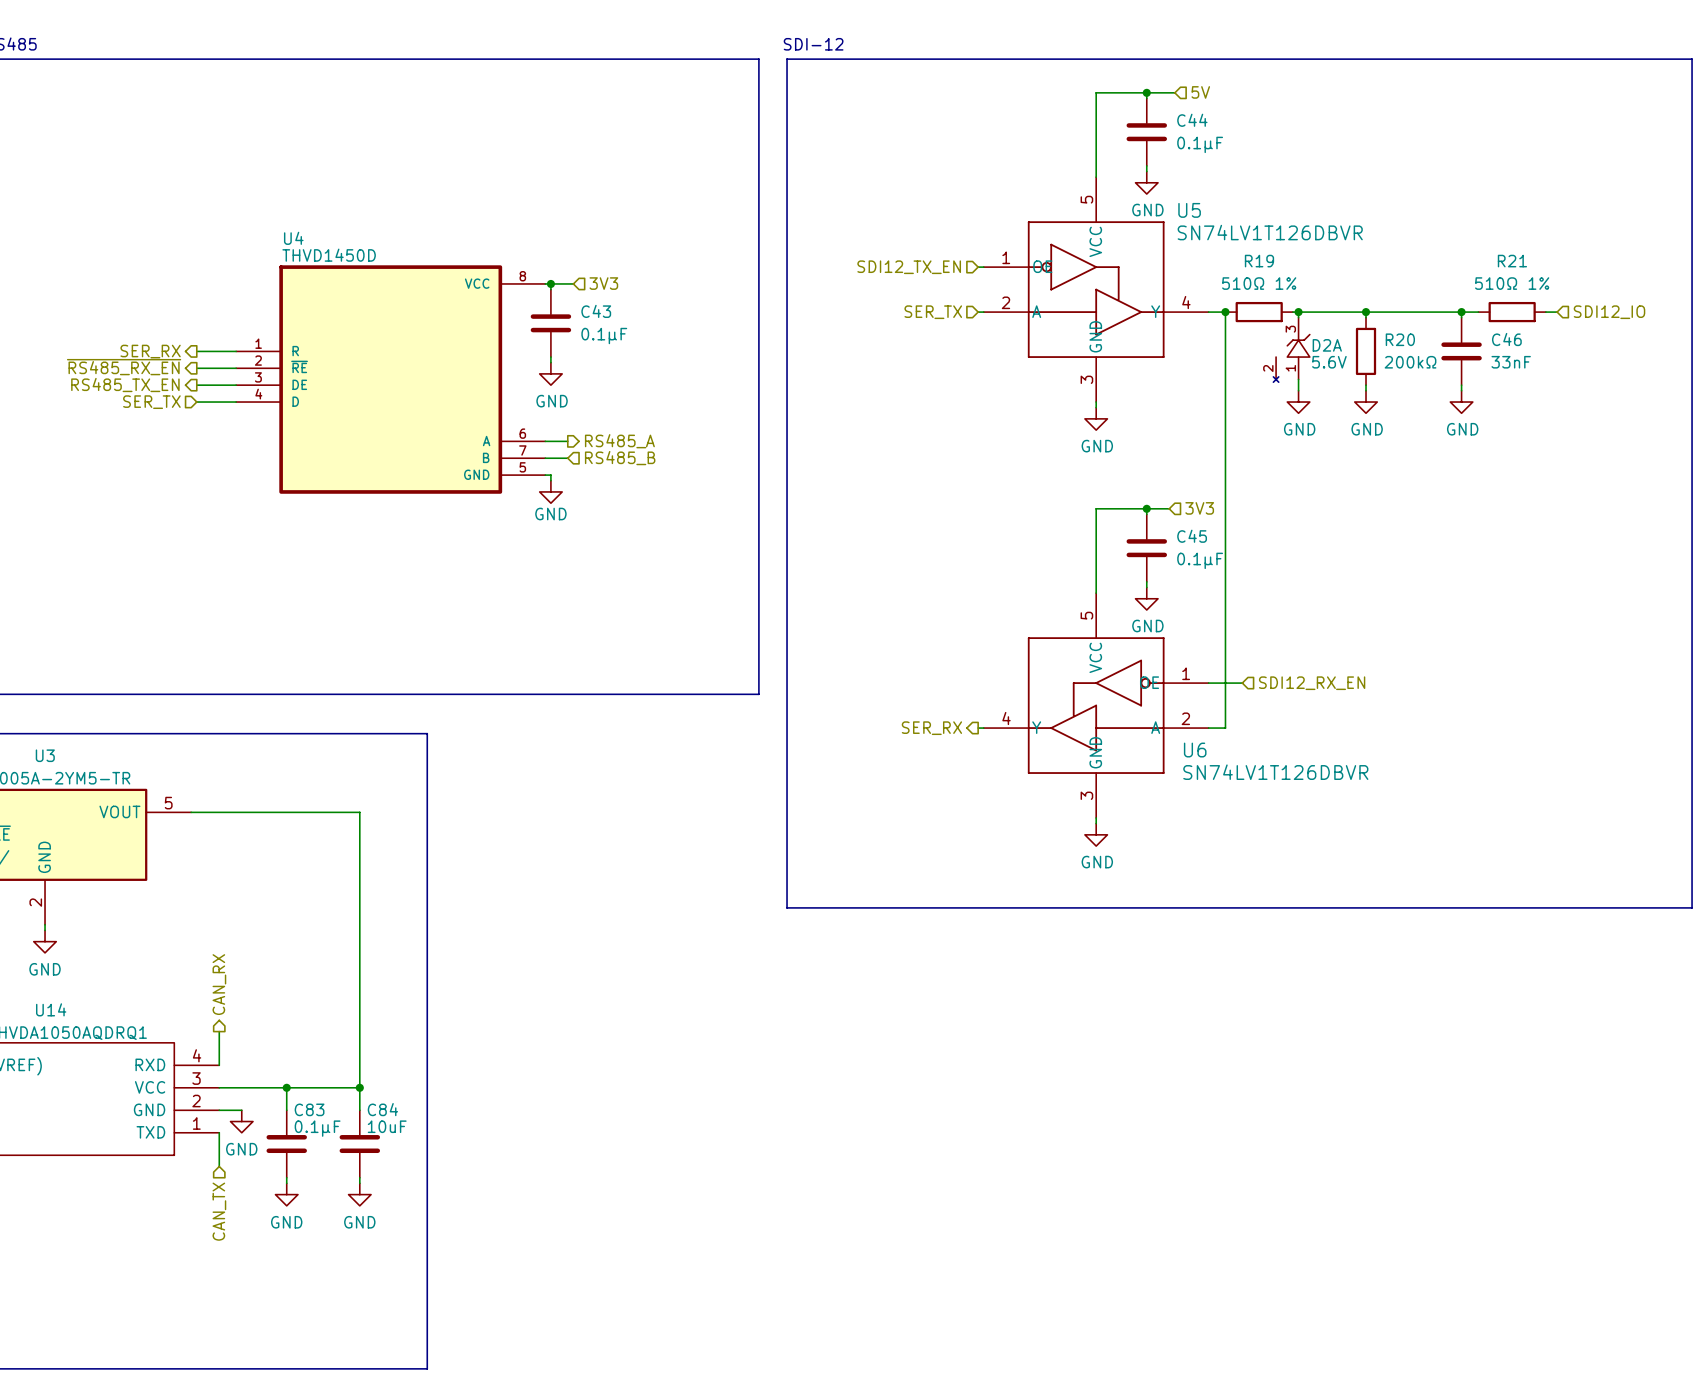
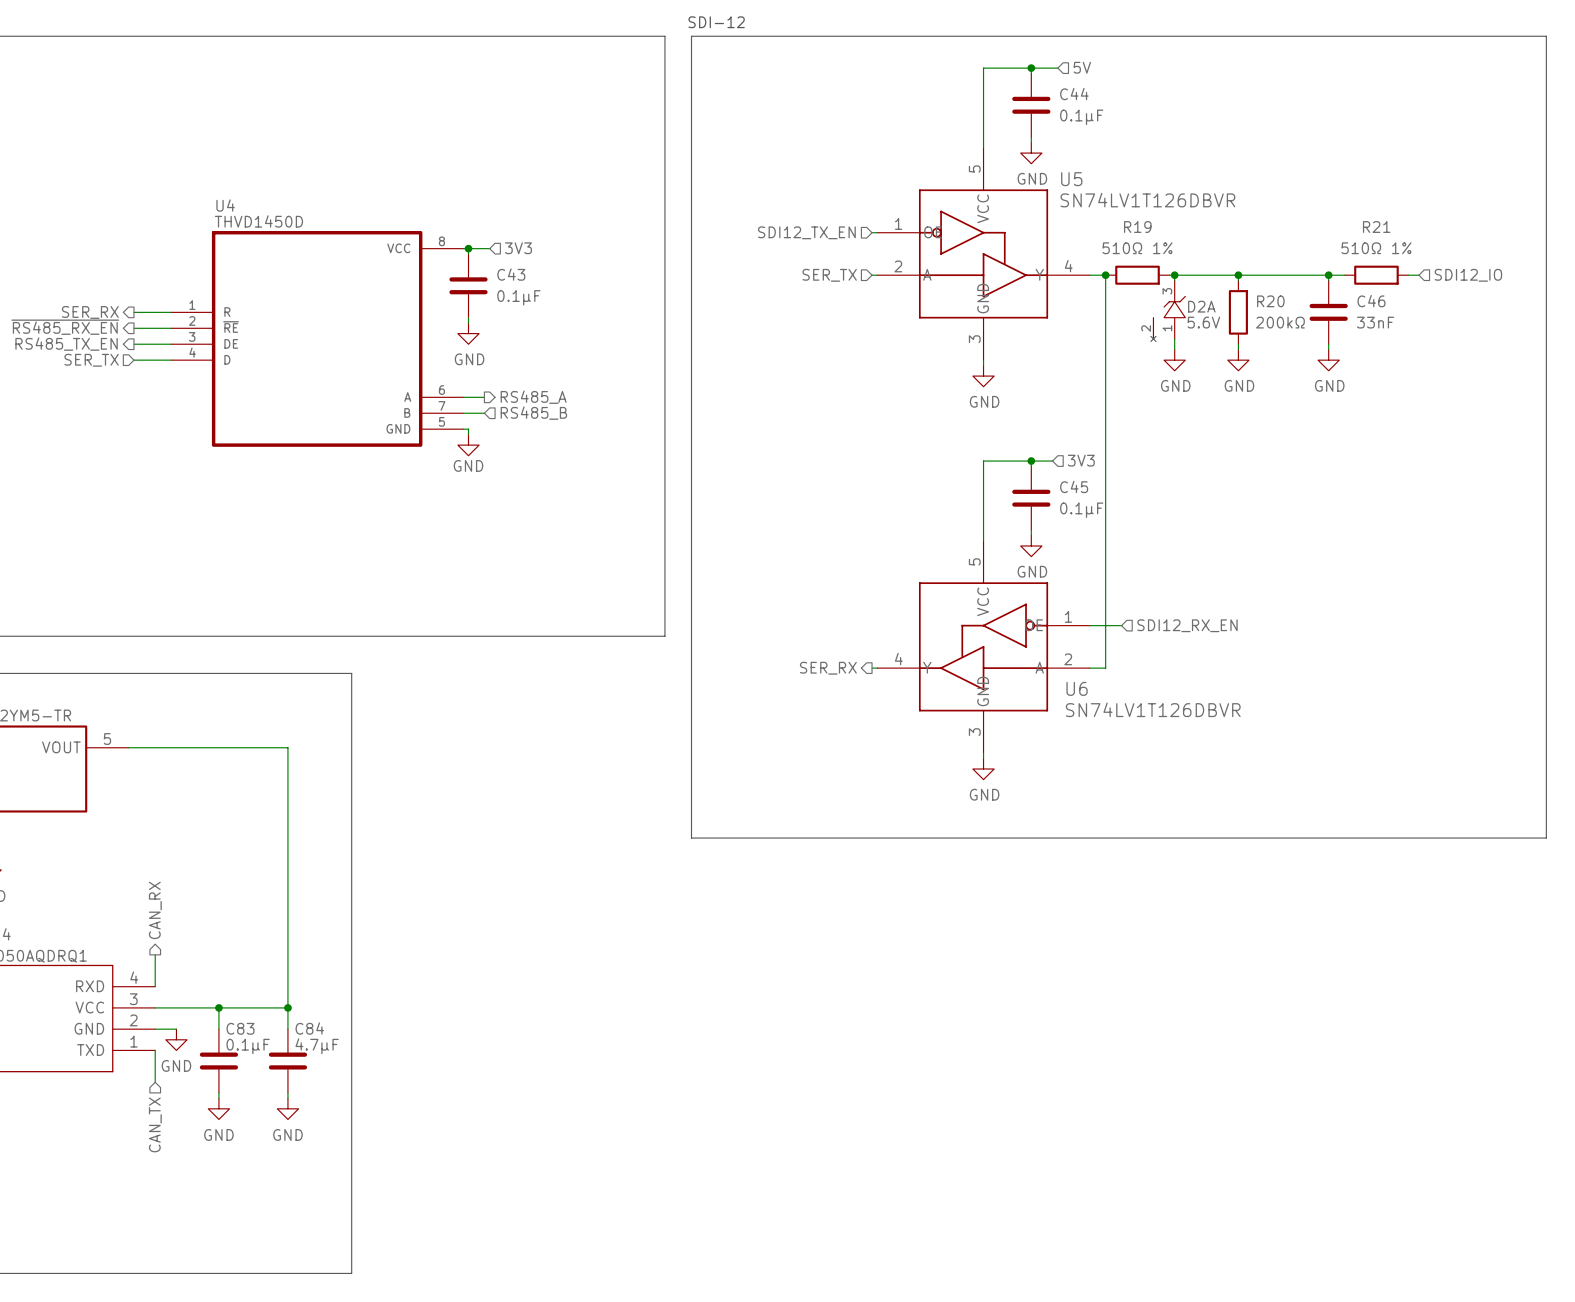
C84 value: 10uF (387, 1126) -> 4.7μF (317, 1046)

